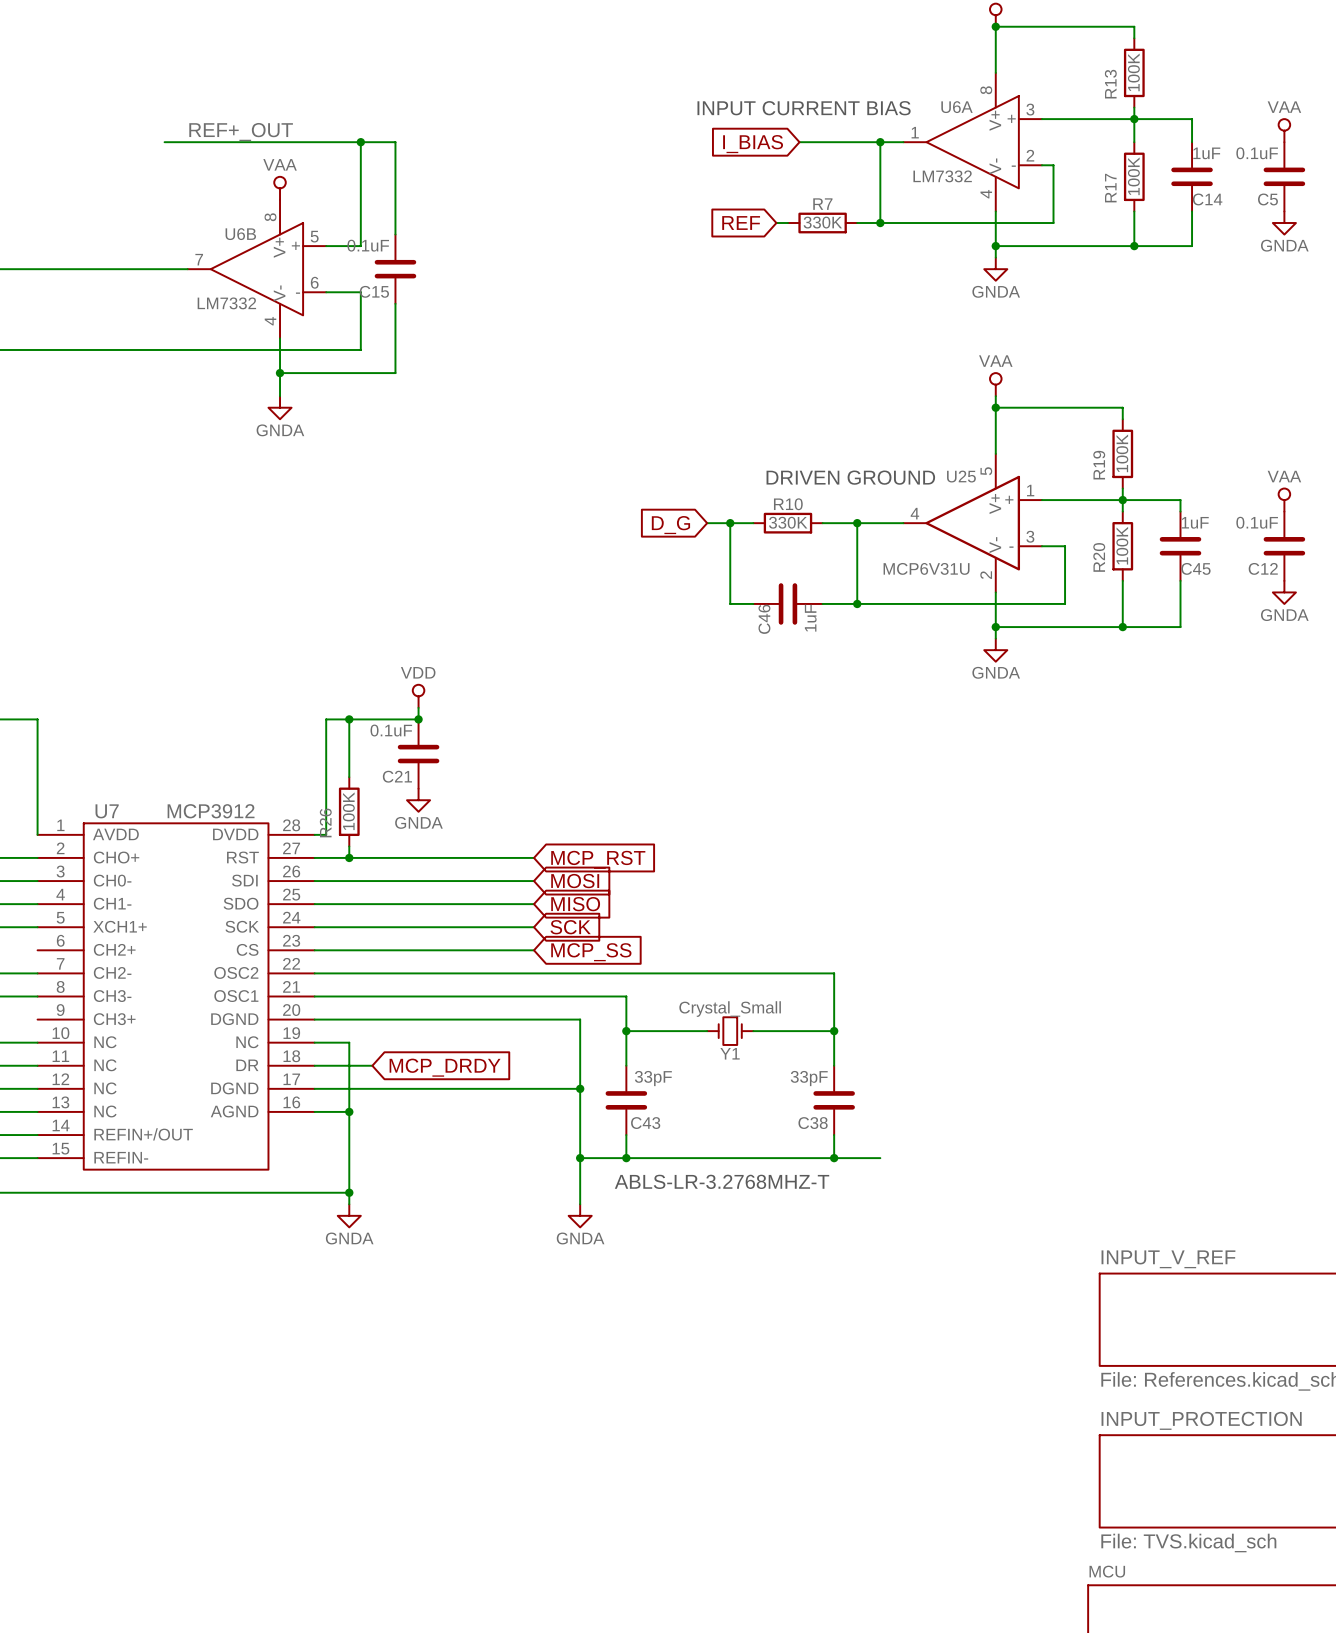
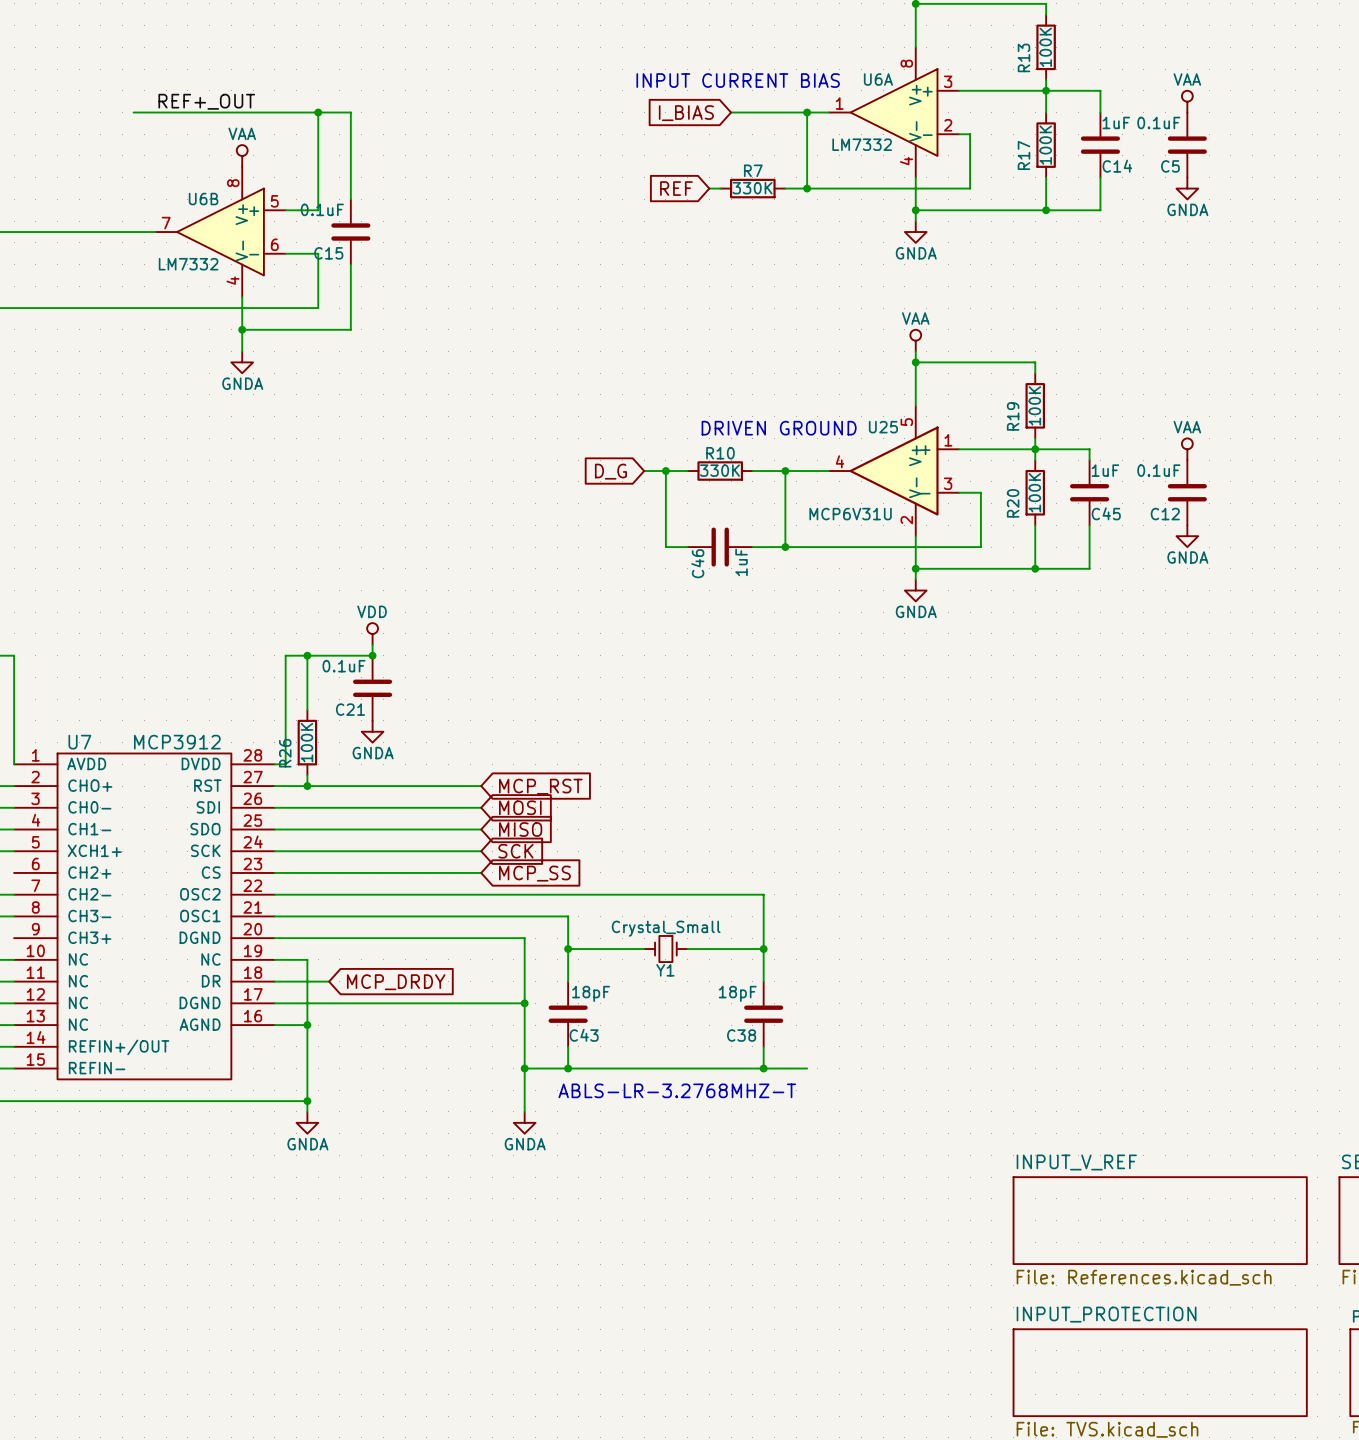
C43 value: 33pF (653, 1078) -> 18pF (591, 993)
C38 value: 33pF (809, 1078) -> 18pF (737, 993)

